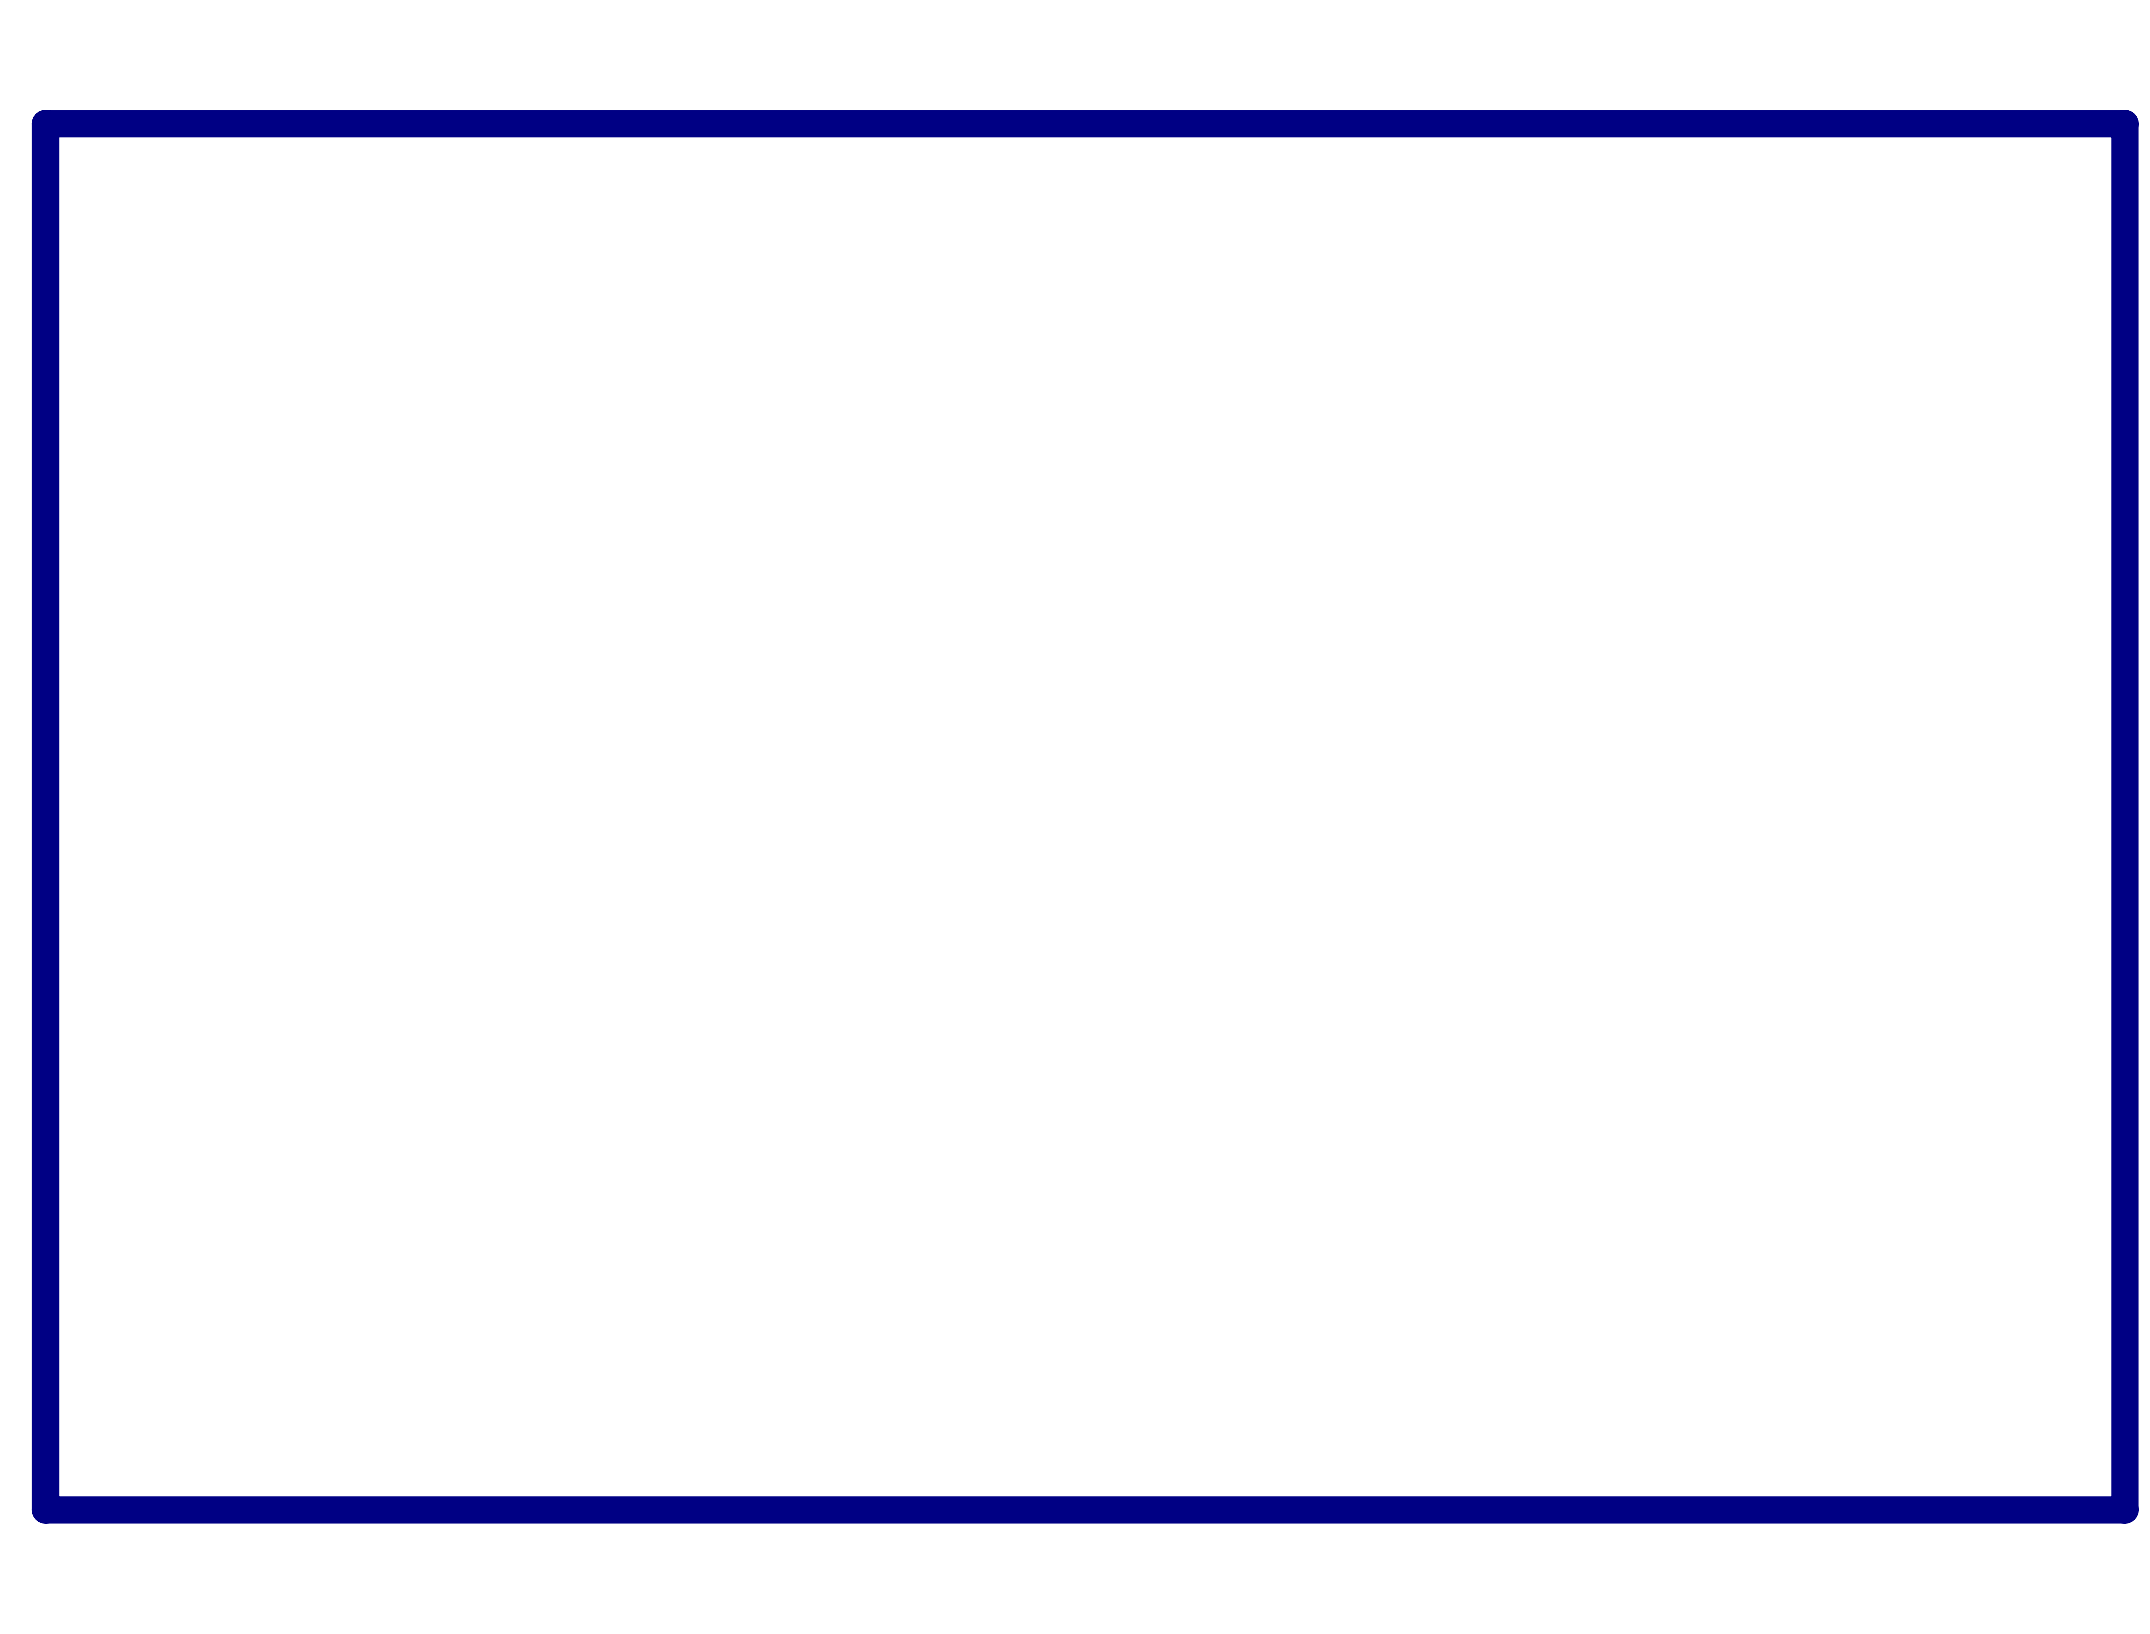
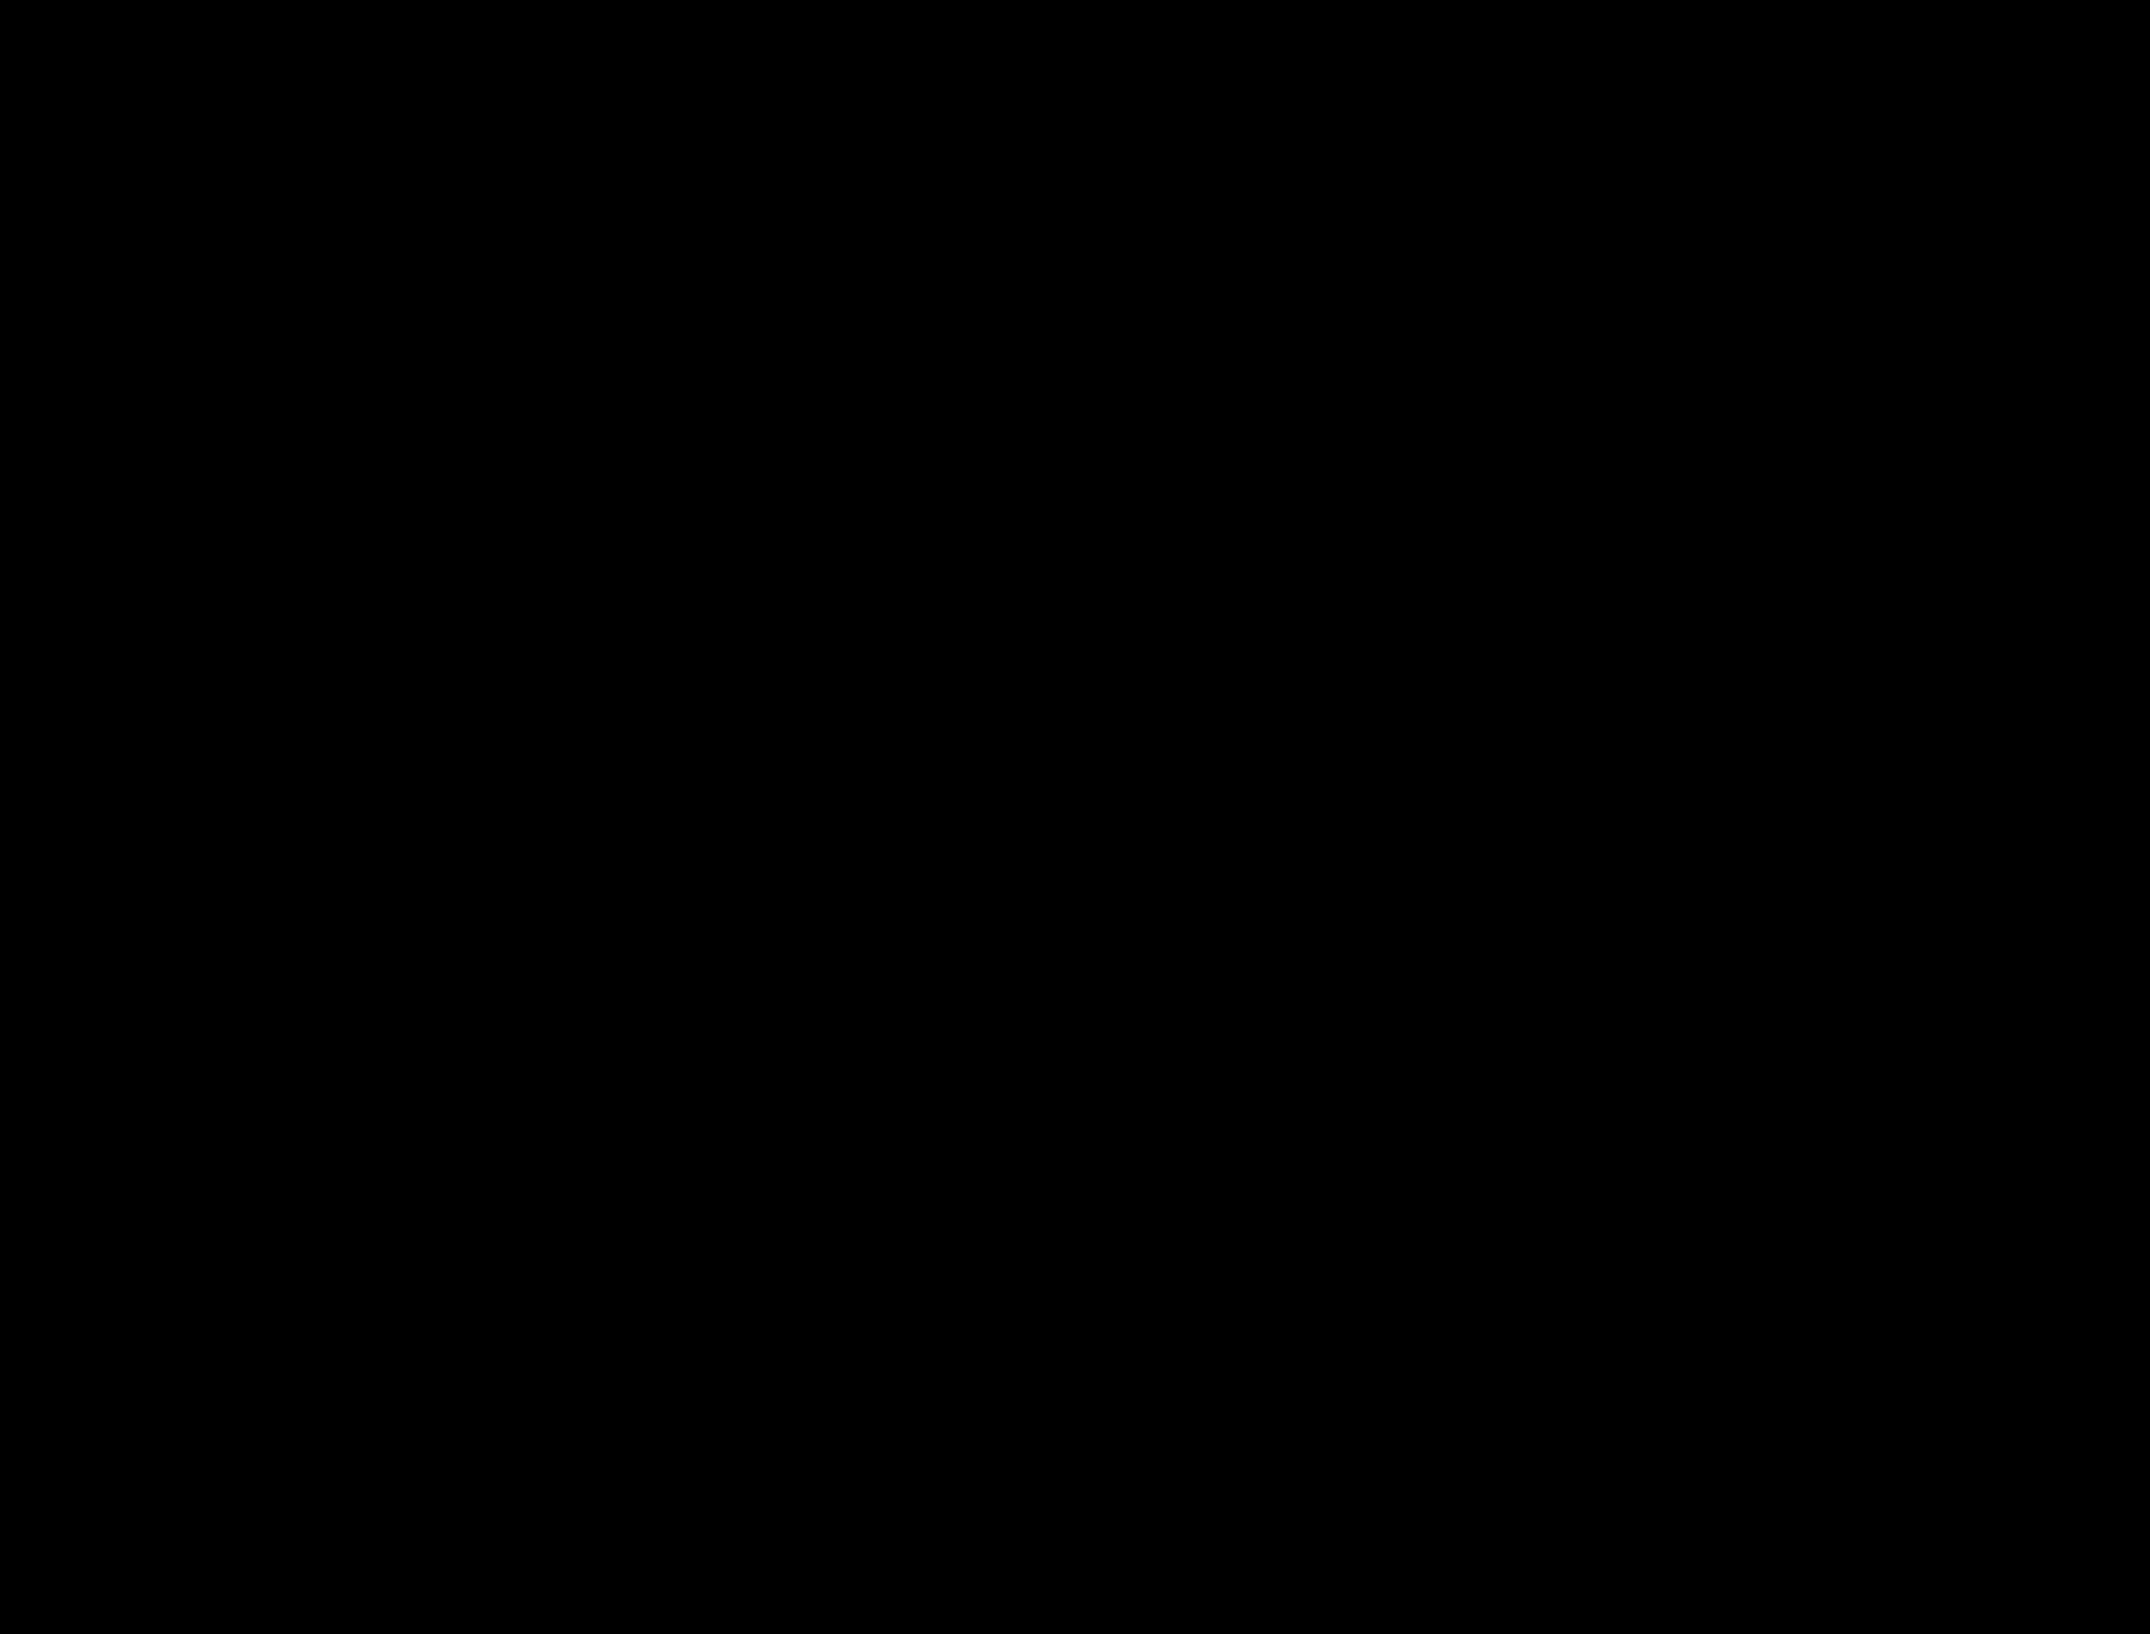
line: (45, 123) (2124, 123) (2124, 1509) (45, 1509) (45, 123) -> none

